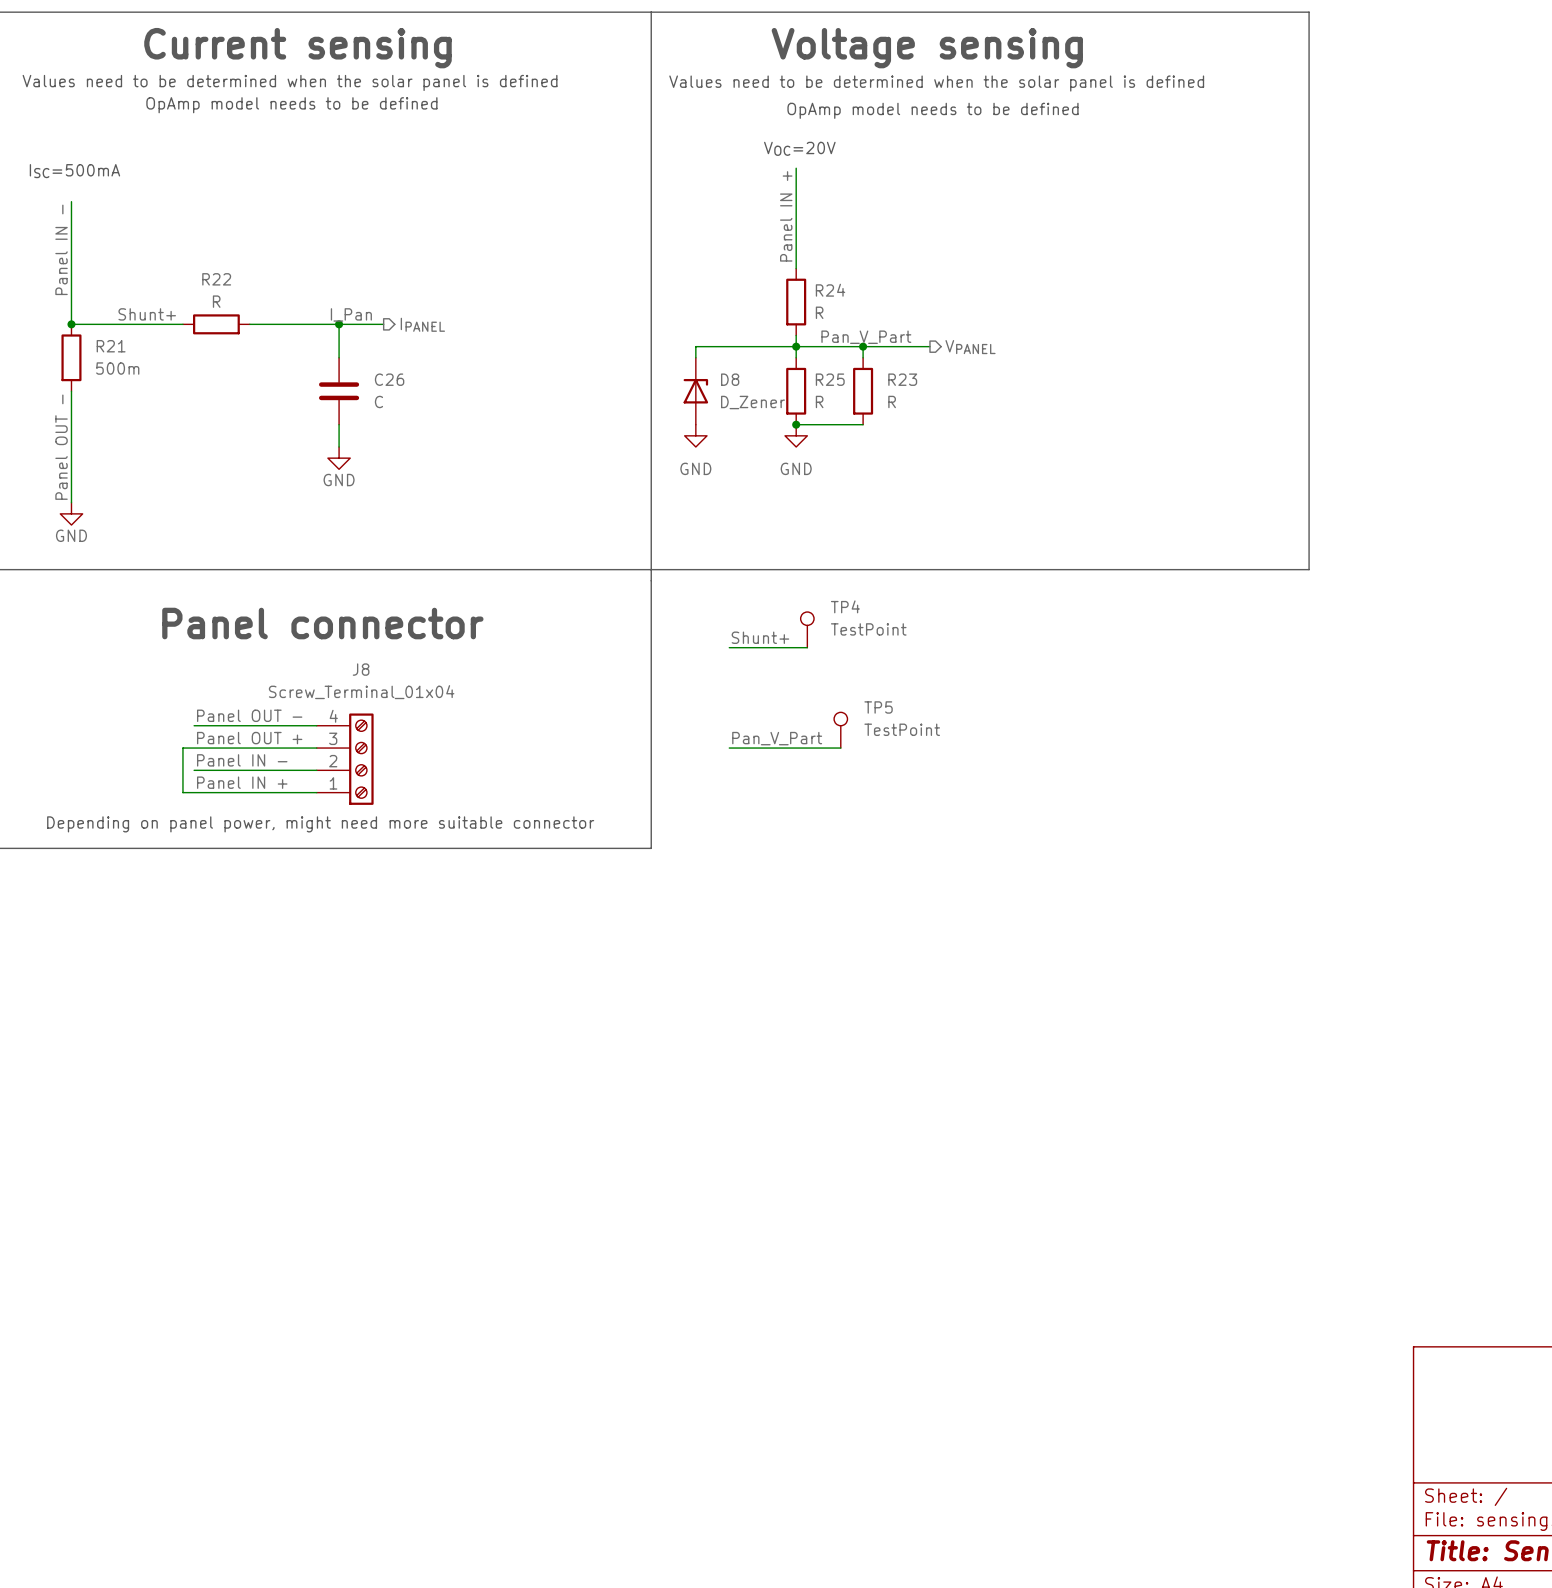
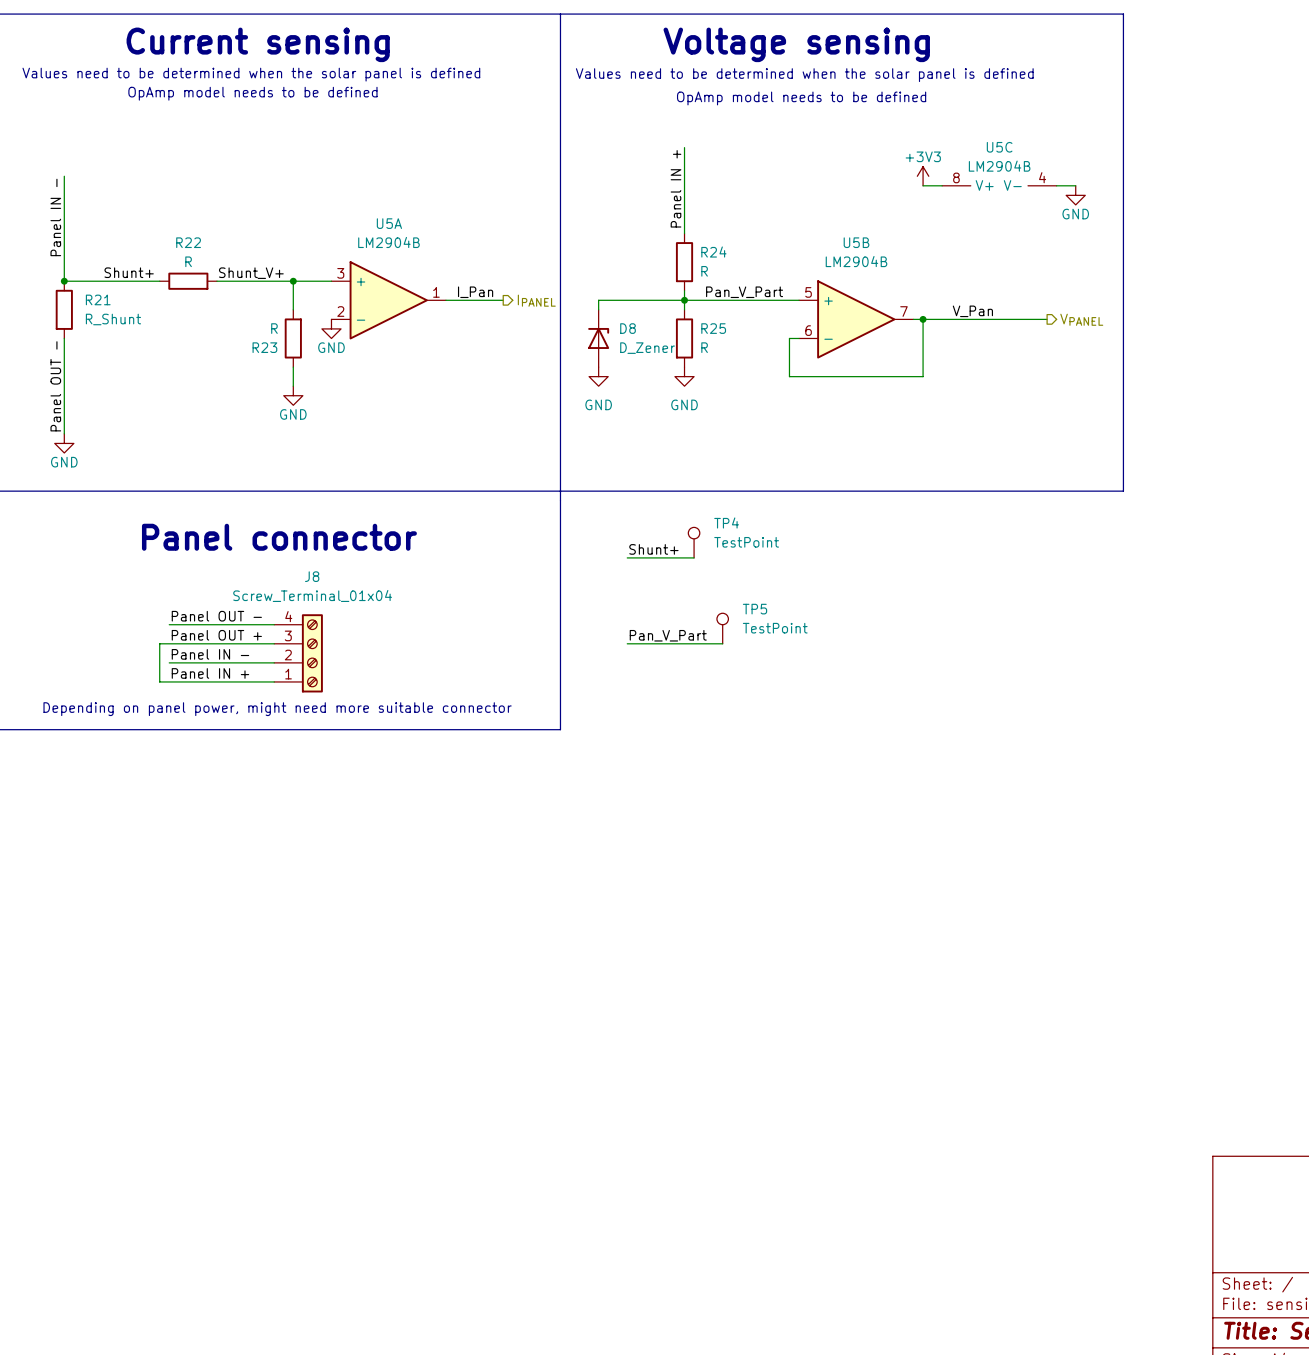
text: VOC=20V (799, 148) -> none
text: ISC=500mA (74, 171) -> none
power symbol: none -> +3V3 (923, 176)
wire: none -> (923, 185) (942, 185)
U5C: none -> LM2904B (999, 185)
wire: none -> (1056, 185) (1075, 185)
power symbol: none -> GND (1075, 195)
label: none -> Shunt_V+ (251, 273)
label position: I_Pan (351, 314) -> I_Pan (475, 292)
hierarchical label position: IPANEL (422, 324) -> IPANEL (536, 300)
U5A: none -> LM2904B (388, 300)
wire: none -> (445, 300) (503, 300)
wire: (863, 346) (863, 357) -> none
junction: (863, 346) -> none
hierarchical label: VPANEL (970, 347) -> none
label: none -> V_Pan (972, 311)
R21 value: 500m (117, 368) -> R_Shunt (113, 319)
U5B: none -> LM2904B (856, 319)
wire: none -> (913, 319) (1047, 319)
wire: none -> (923, 319) (923, 376) (789, 376) (789, 338) (799, 338)
junction: none -> (923, 319)
hierarchical label: none -> VPANEL (1081, 319)
R23 name position: R23 (902, 379) -> R23 (264, 347)
power symbol: none -> GND (331, 328)
C26: C (339, 391) -> none
R23 position: (863, 391) -> (293, 338)
R23 value position: R (892, 401) -> R (274, 328)
wire: (796, 424) (863, 424) -> none
junction: (796, 424) -> none

